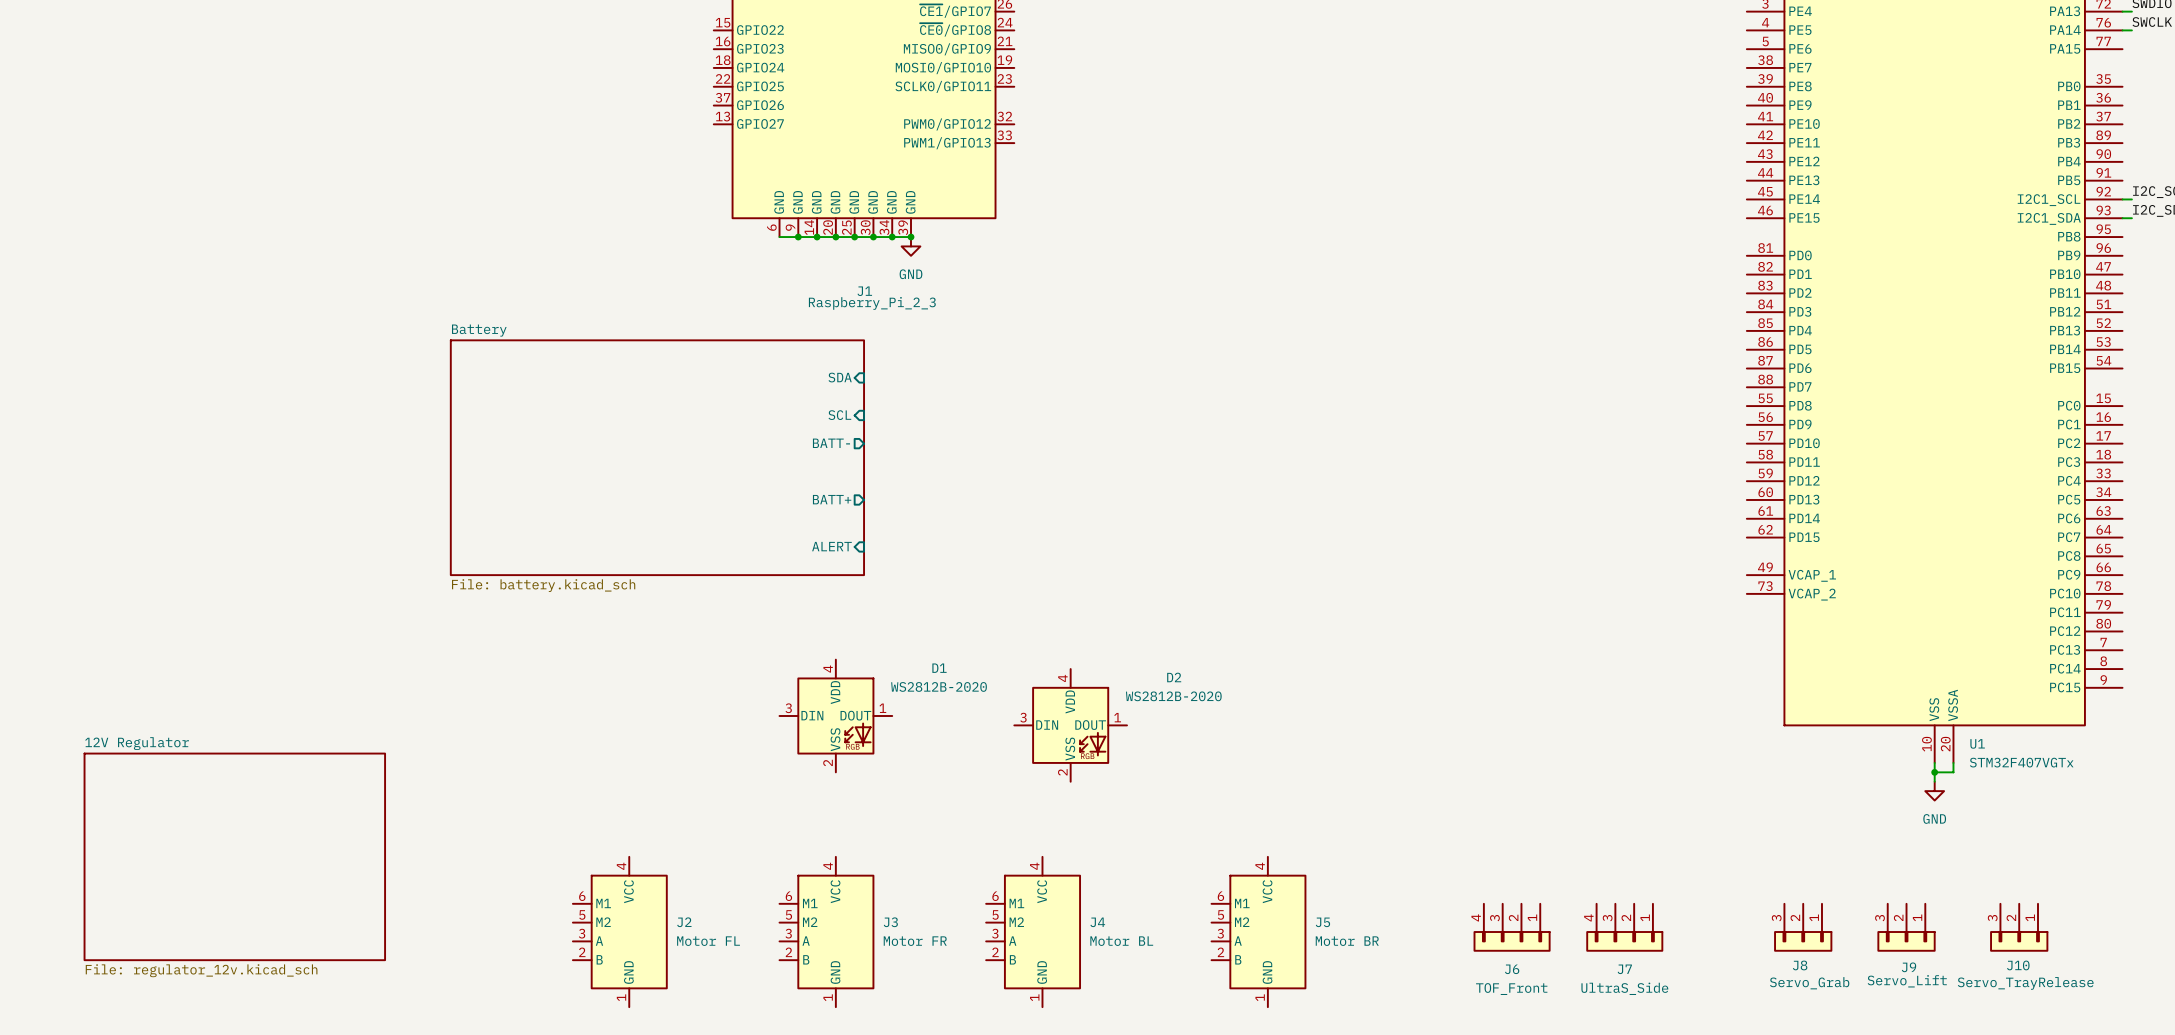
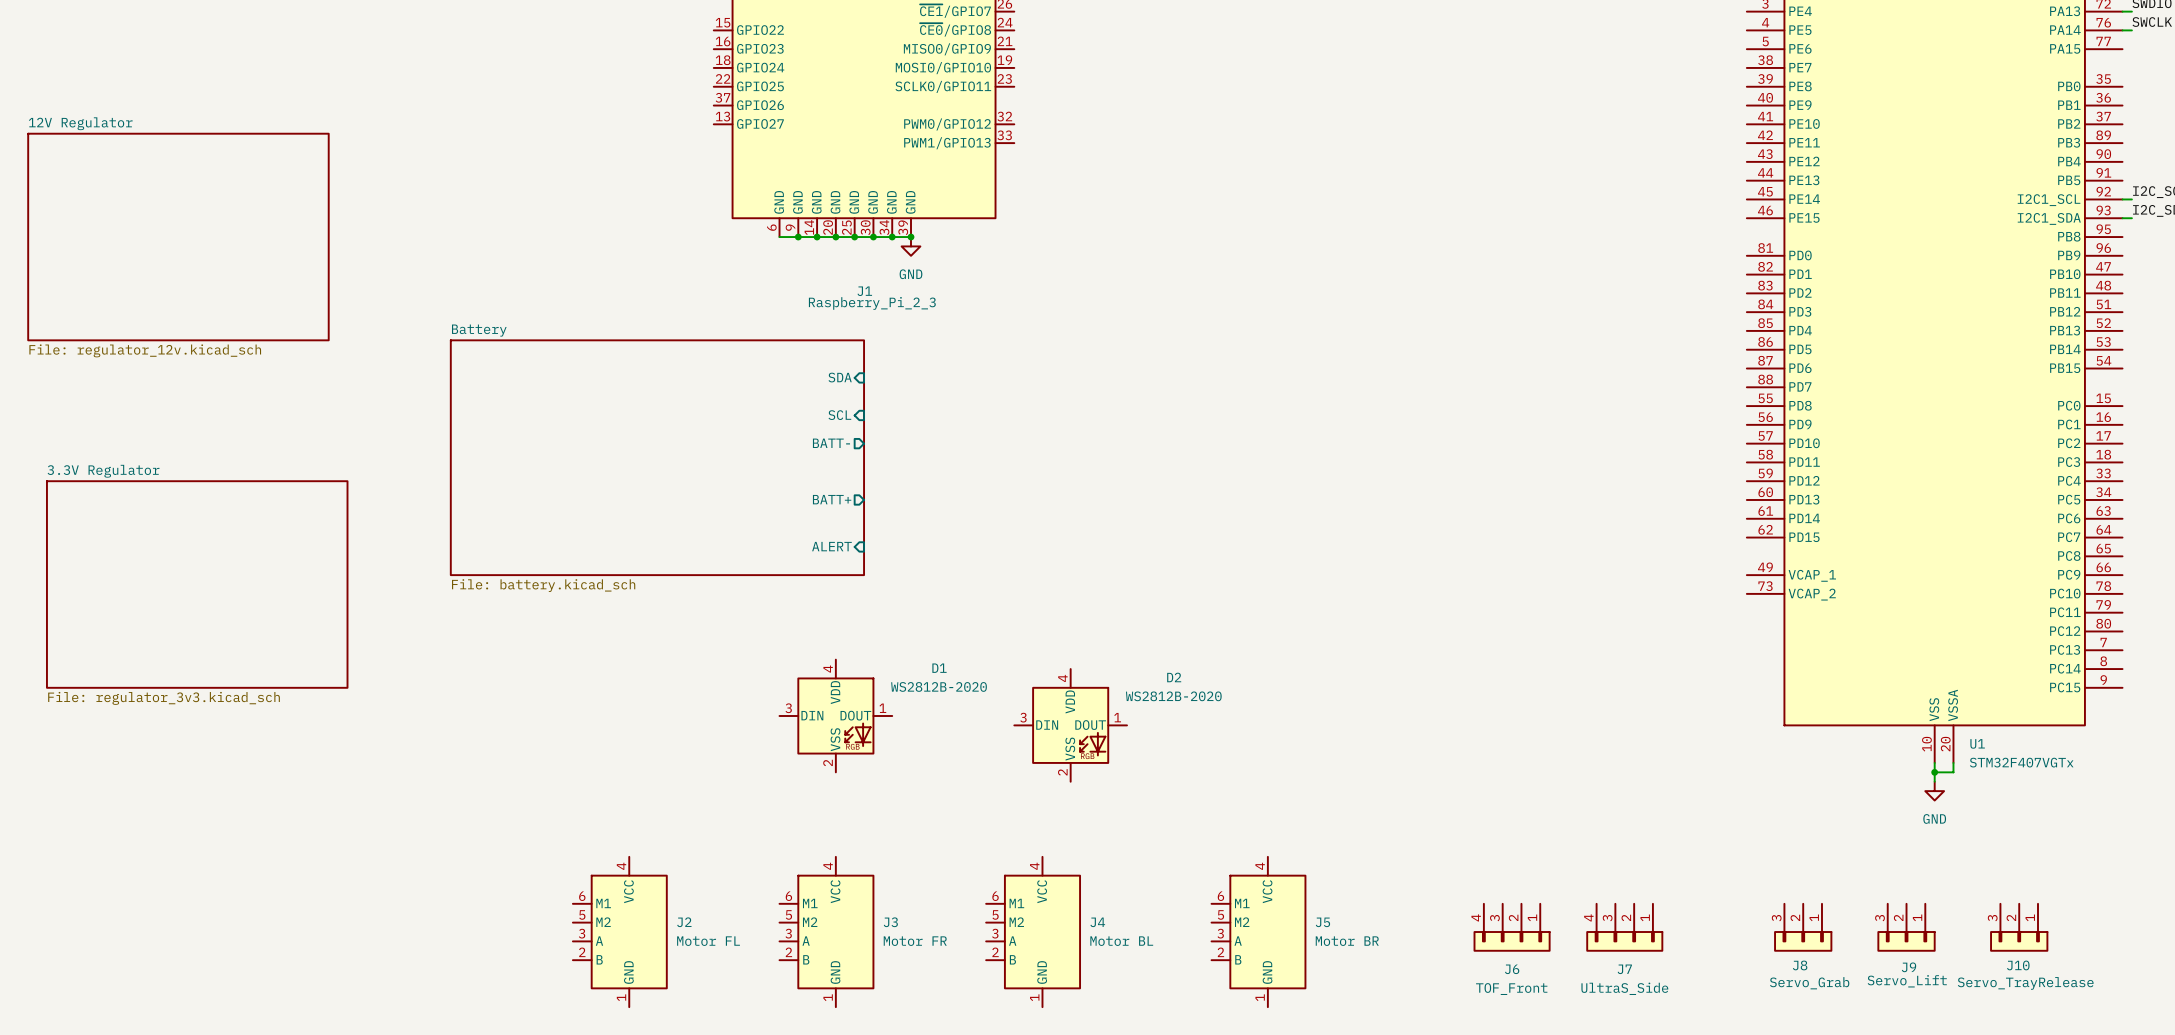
sheet 3.3V Regulator: none -> File: regulator_3v3.kicad_sch (197, 584)
sheet 12V Regulator position: (234, 856) -> (178, 237)

